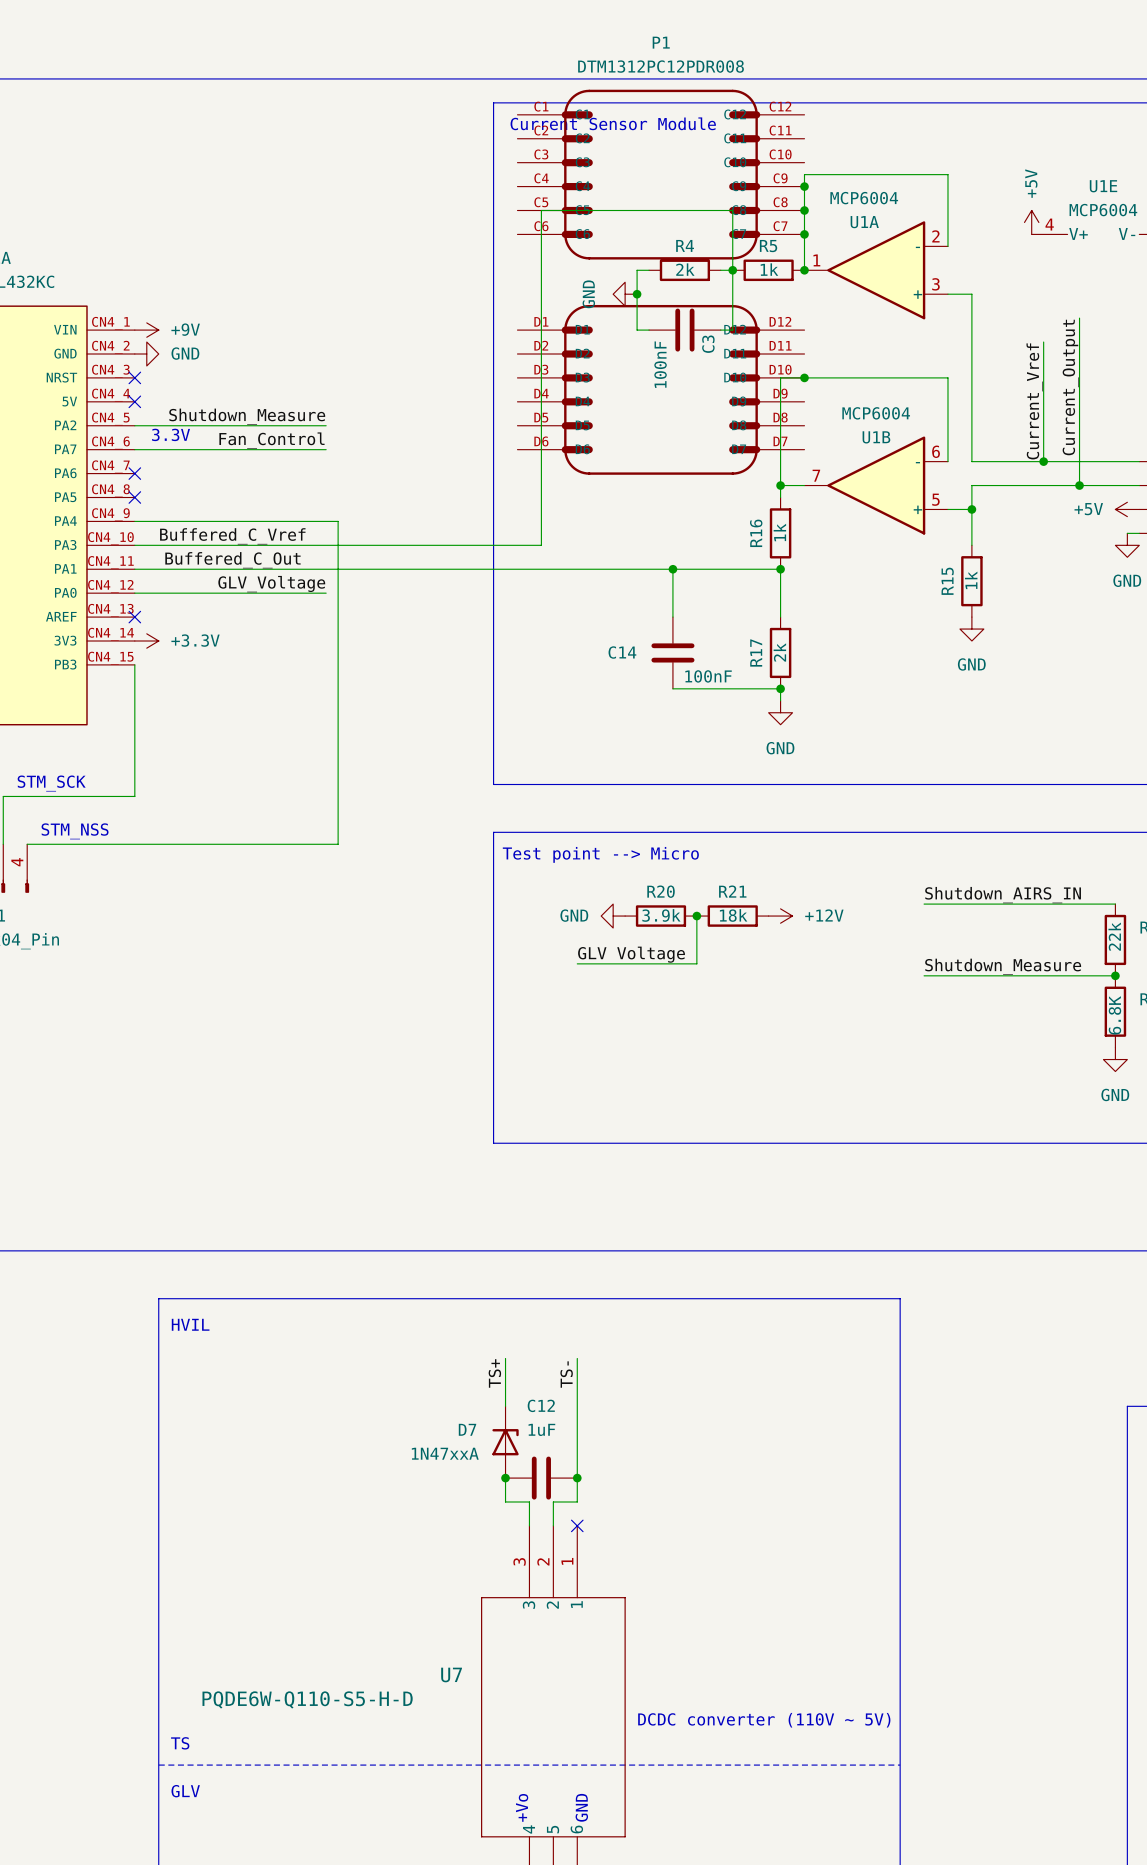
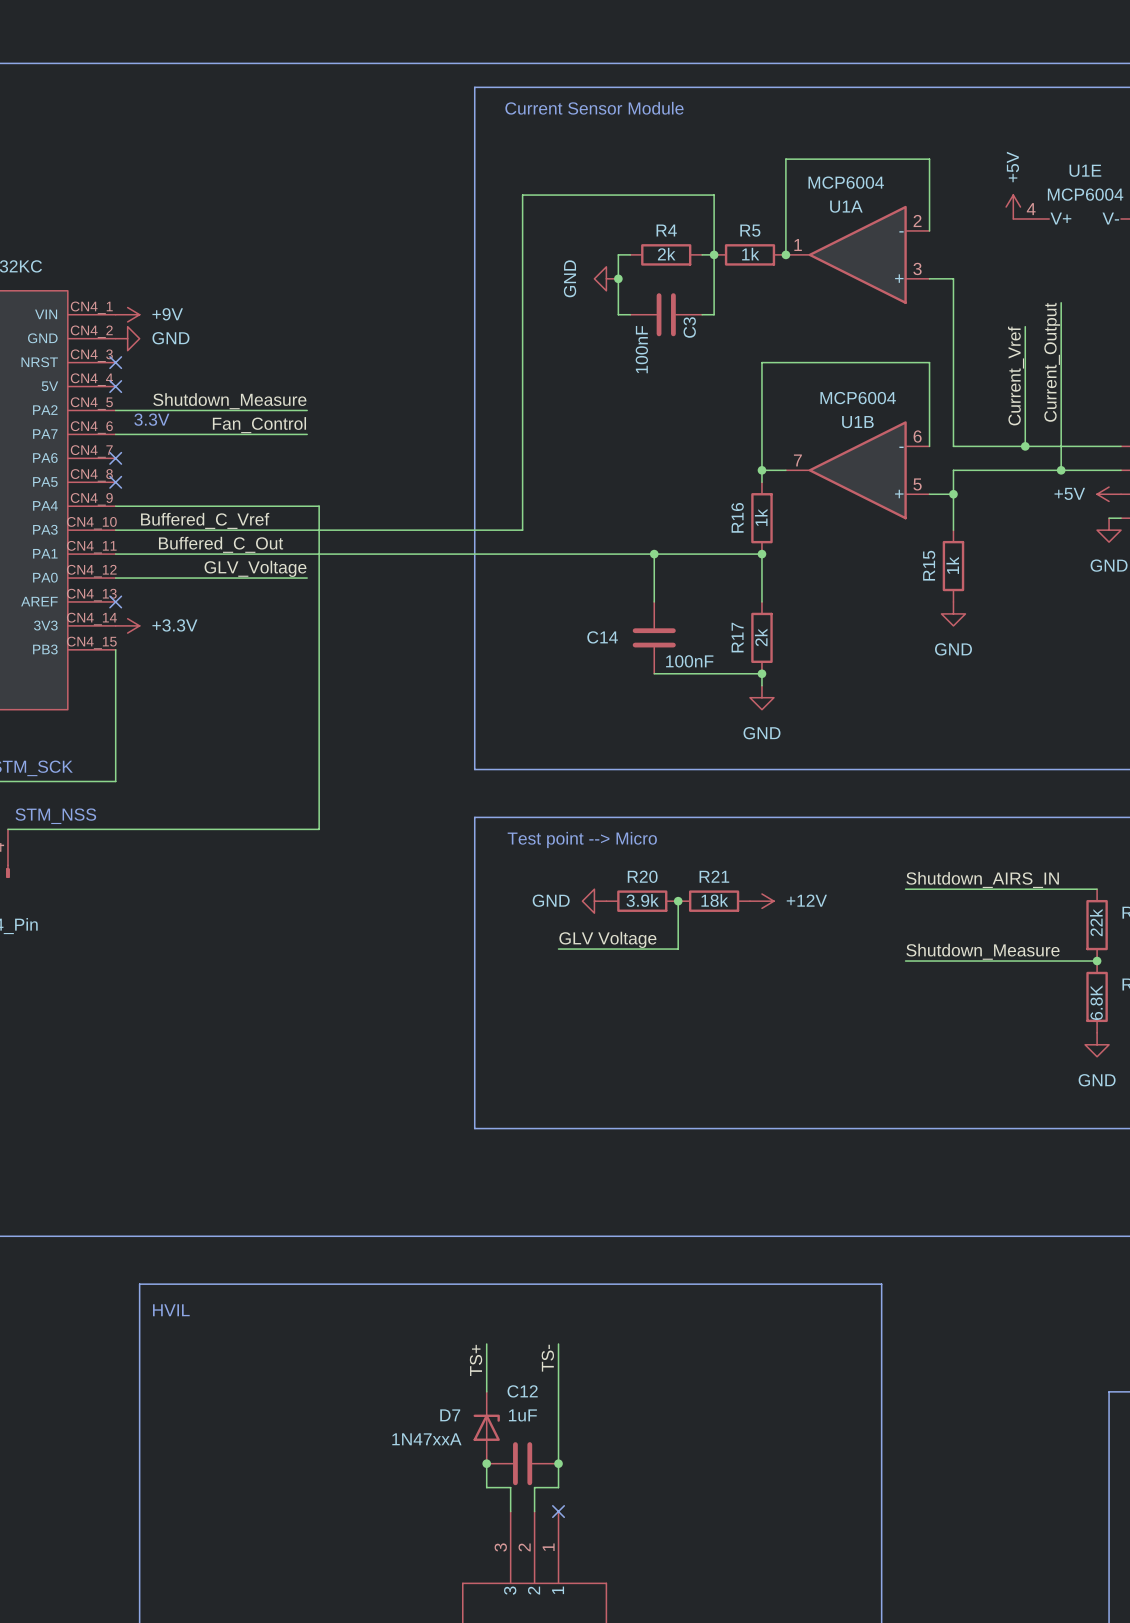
junction: (804, 186) -> none
junction: (804, 210) -> none
junction: (804, 234) -> none
P1: DTM1312PC12PDR008 (660, 282) -> none
junction: (804, 377) -> none

